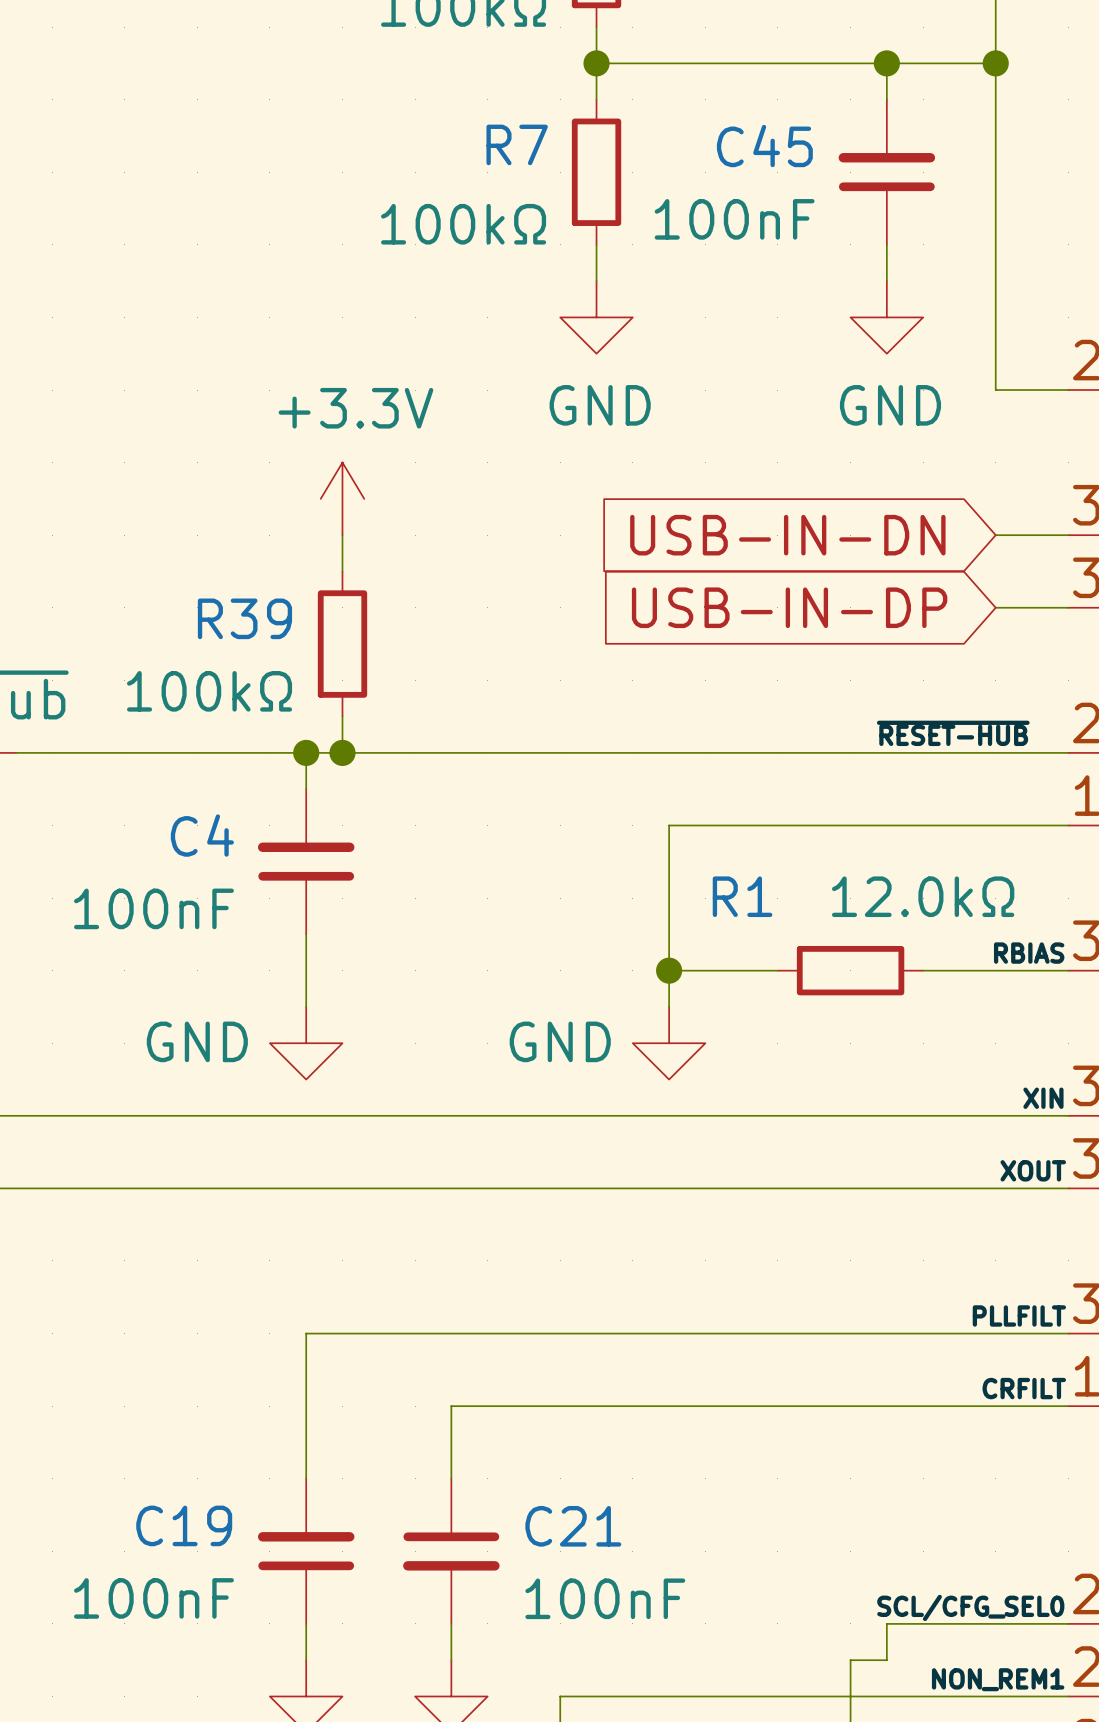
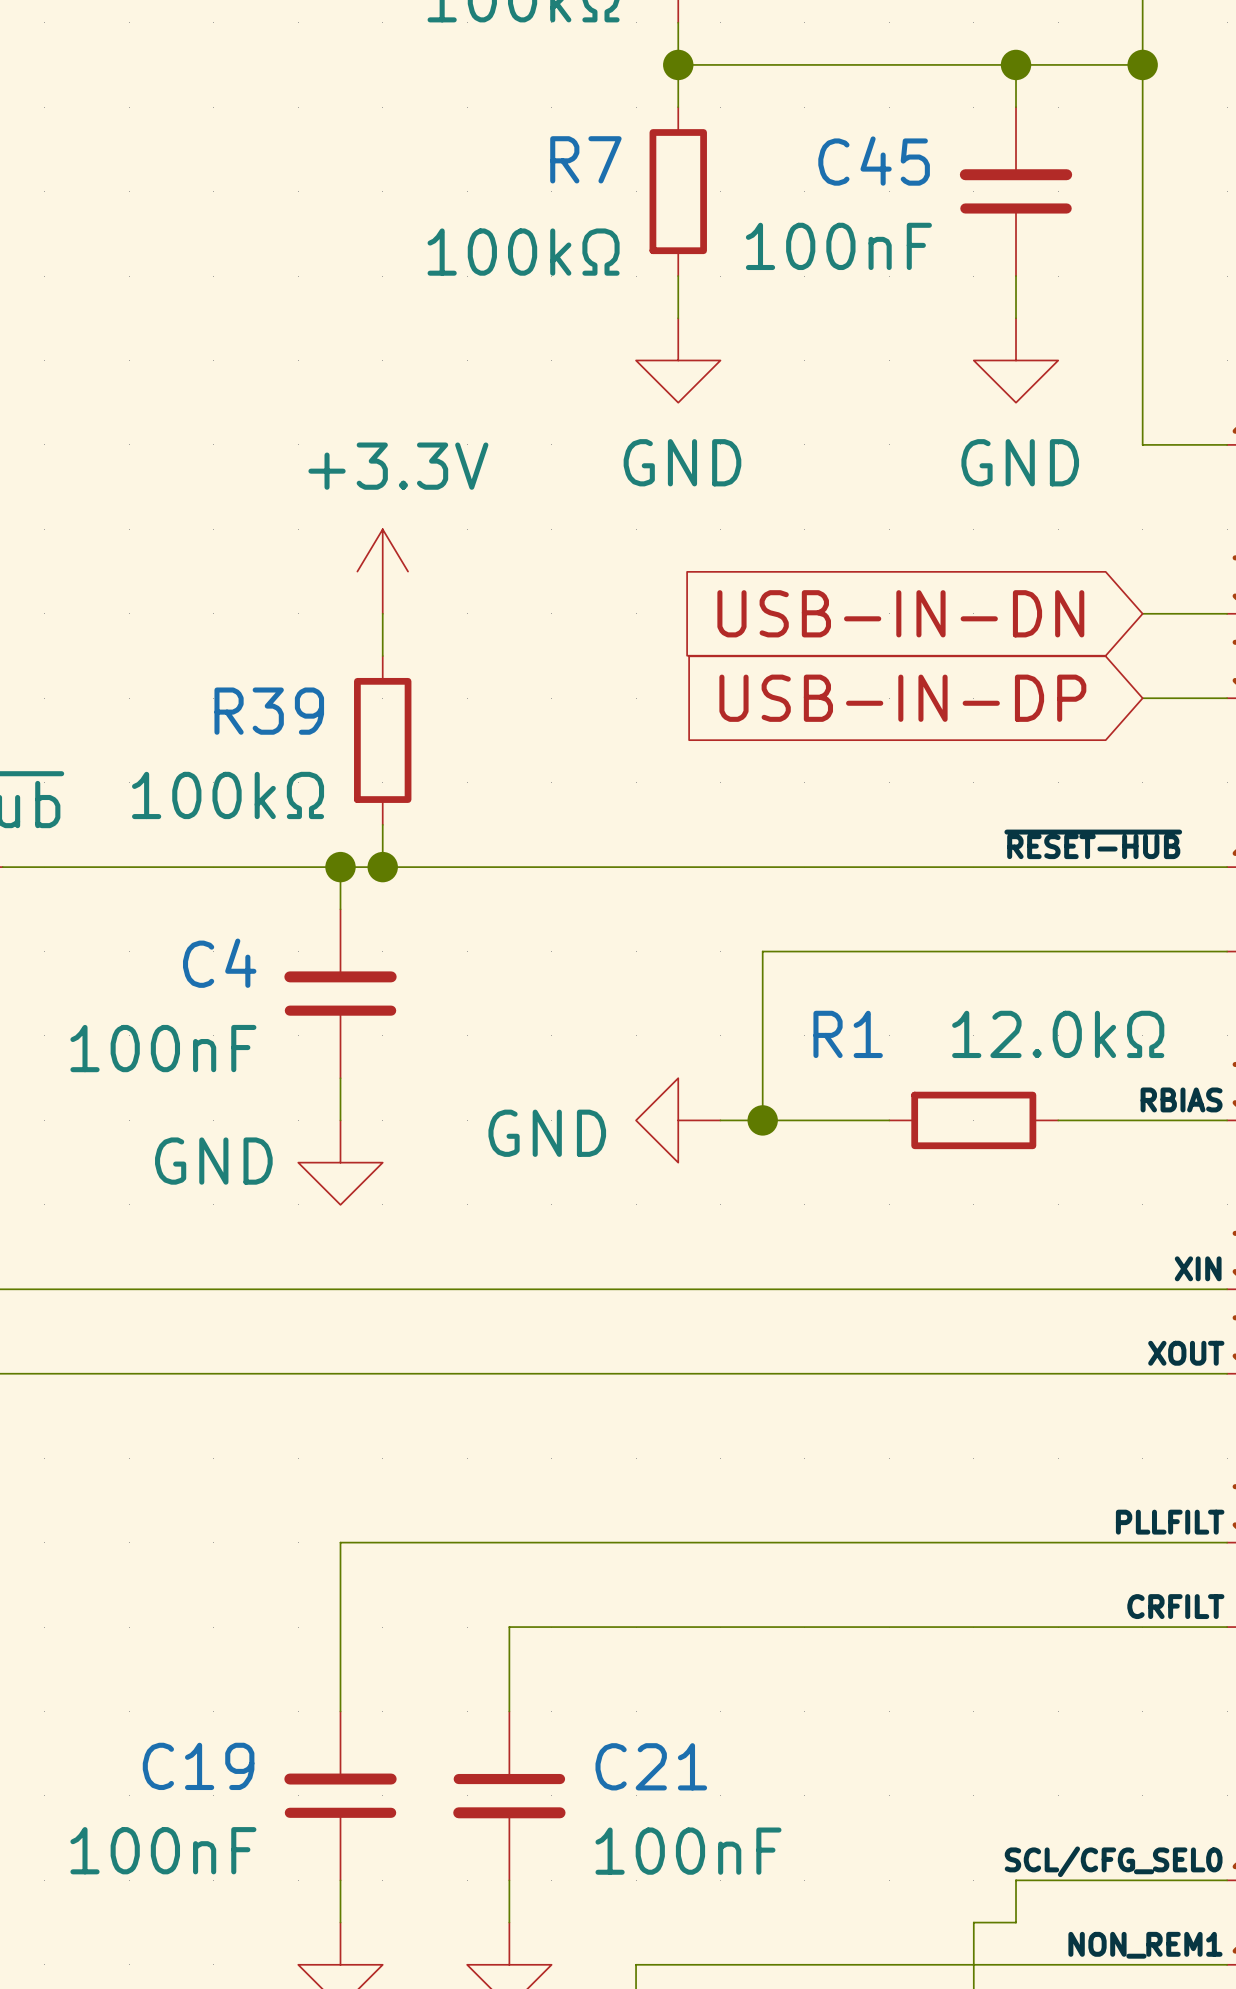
wire: (669, 970) (669, 1006) -> (762, 1120) (720, 1120)
power symbol position: GND (306, 1043) -> GND (340, 1162)
power symbol rotation: 0° (669, 1043) -> 90° clockwise (678, 1120)
power symbol position: GND (669, 1043) -> GND (678, 1120)

